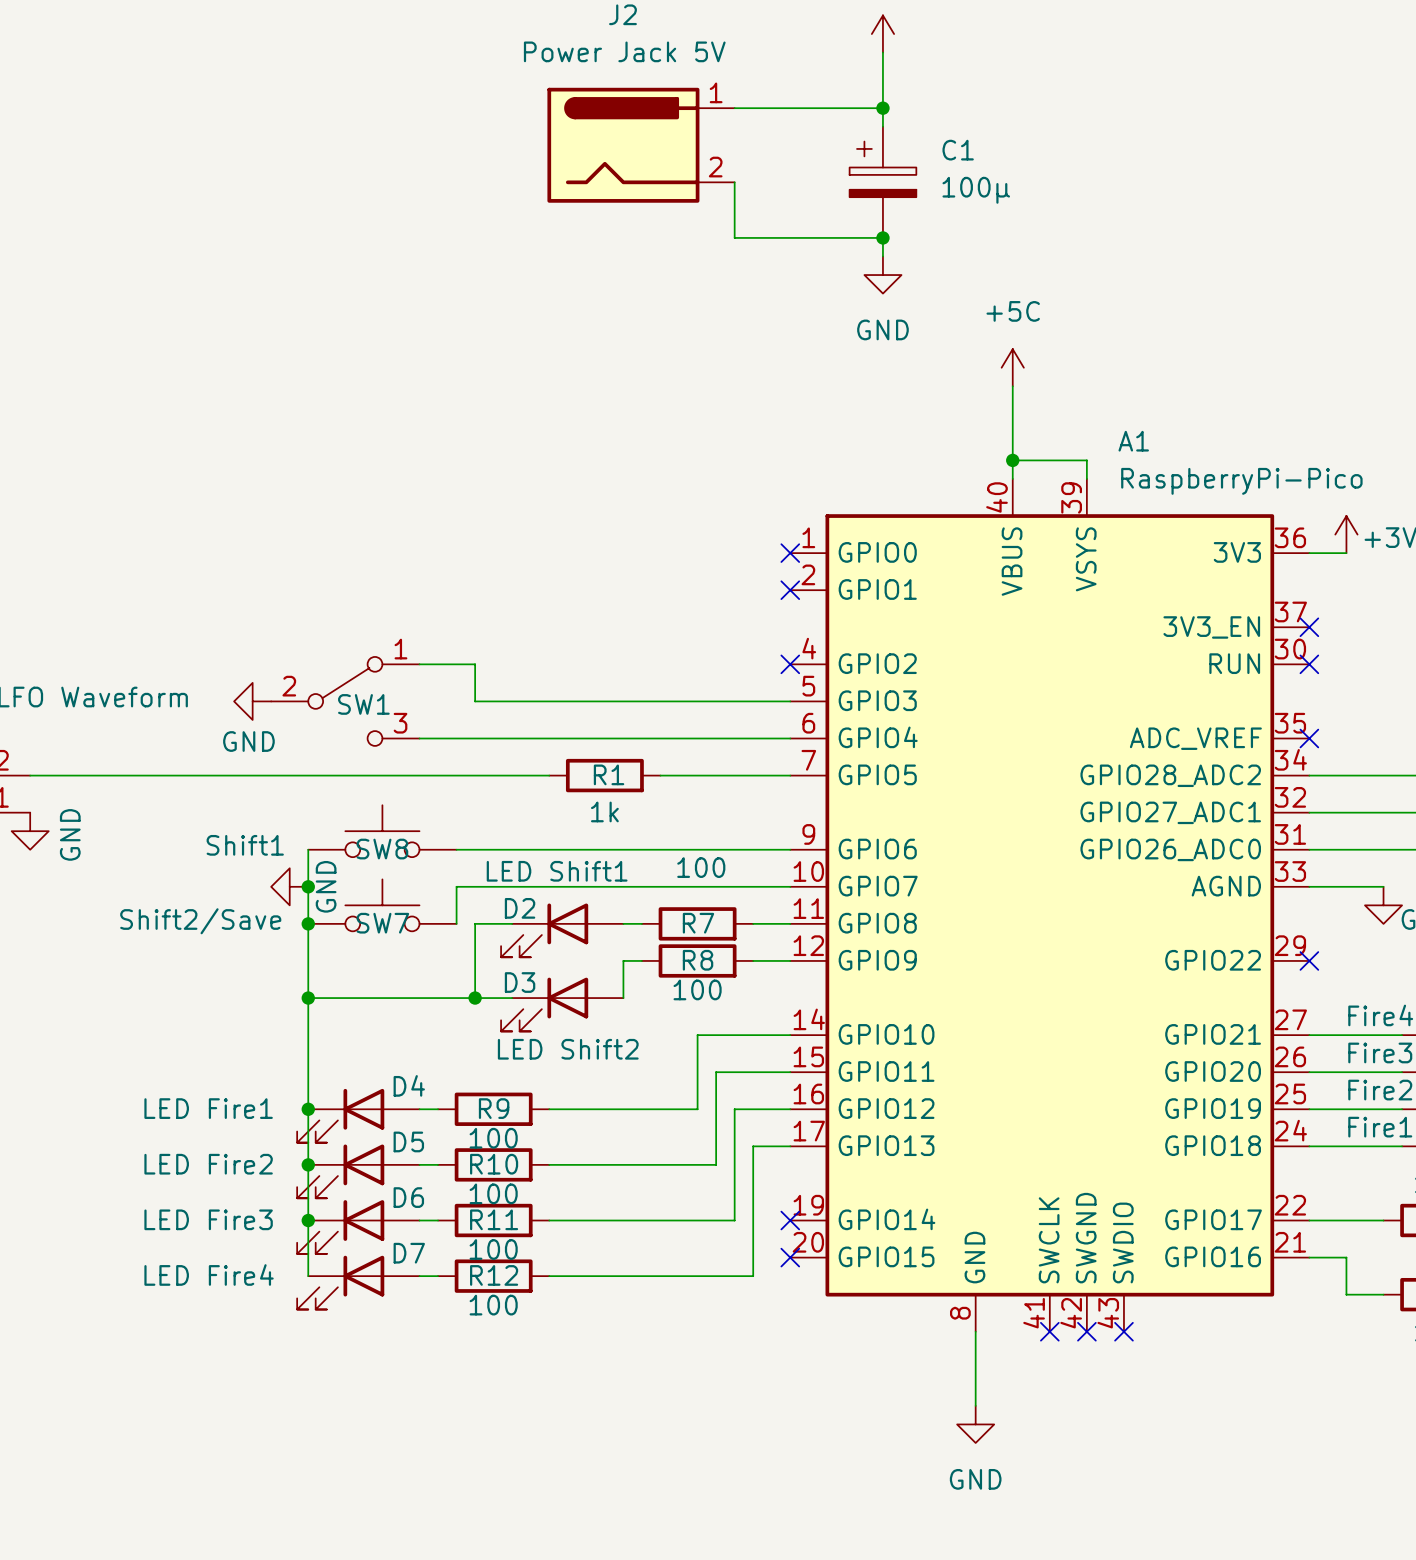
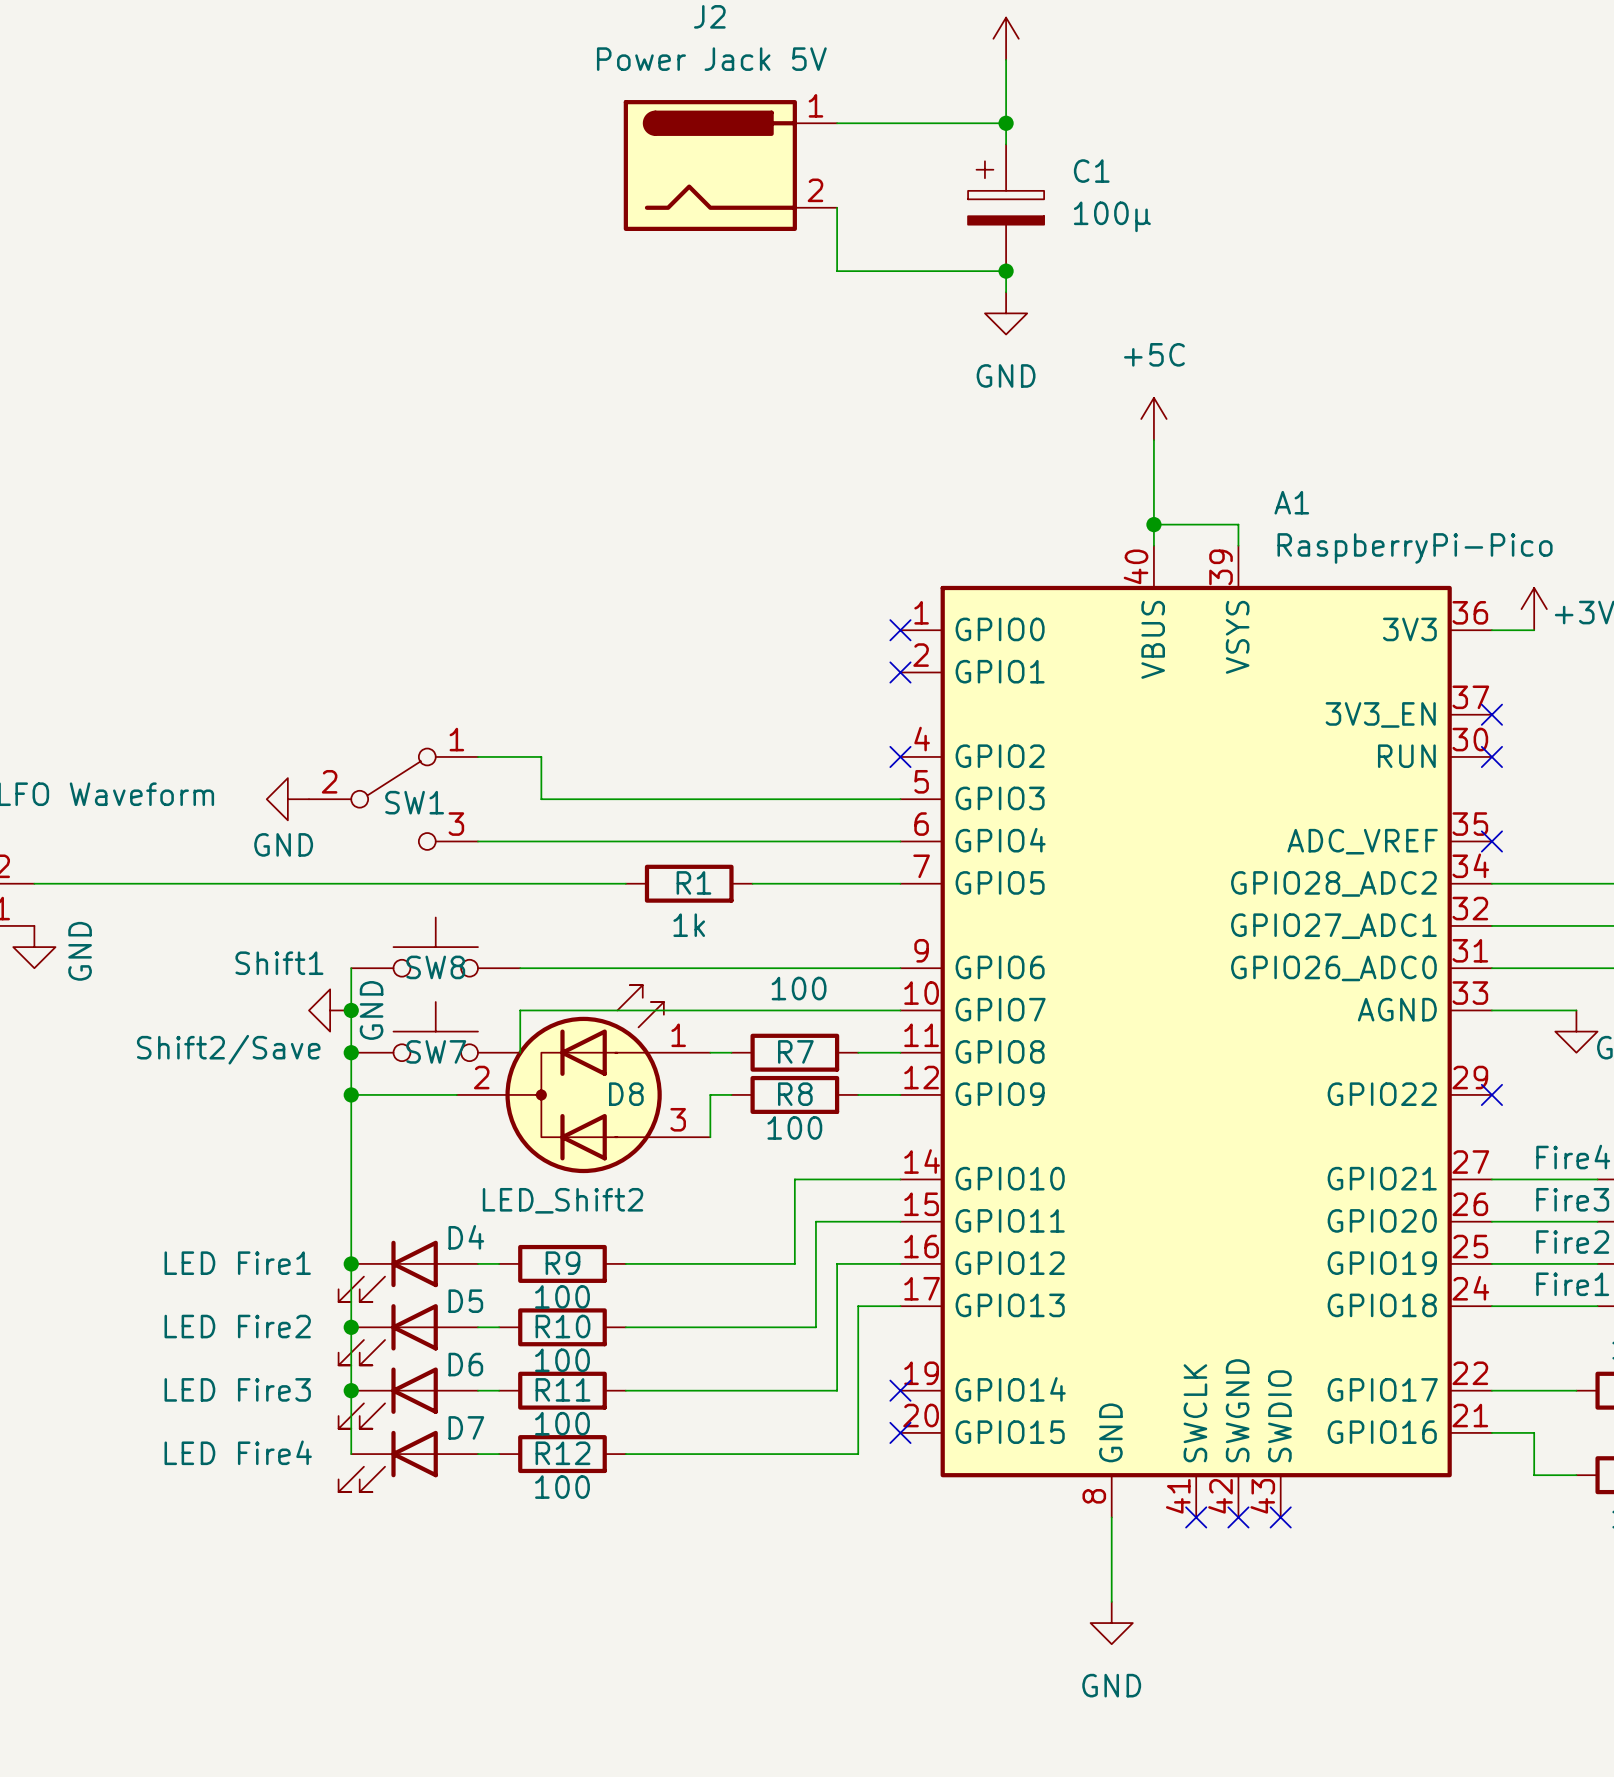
D2: LED Shift1 (562, 930) -> none
D8: none -> LED_Shift2 (583, 1079)
wire: none -> (351, 1094) (456, 1094)
wire: (308, 998) (512, 998) -> none
junction position: (308, 998) -> (351, 1094)
junction: (475, 998) -> none
D3: LED Shift2 (562, 1004) -> none

